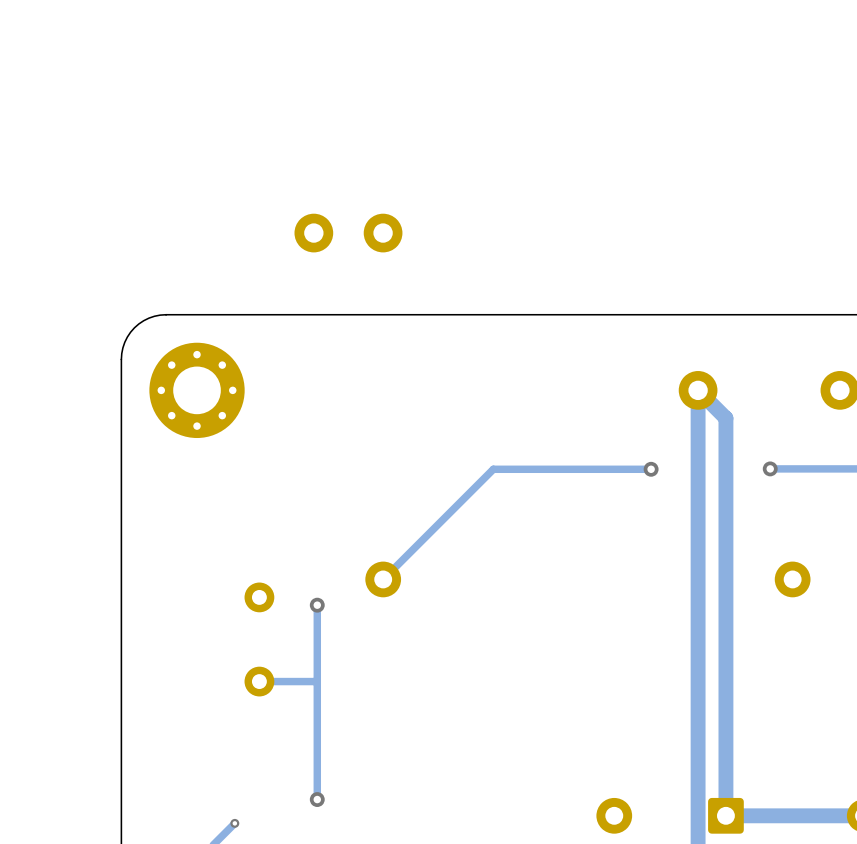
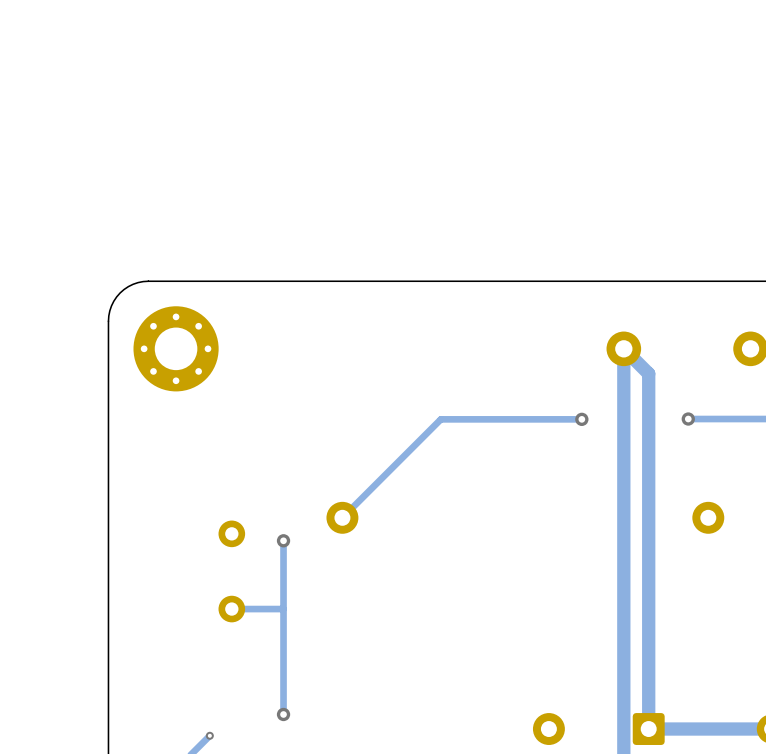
part: (313, 233) -> none
part: (383, 233) -> none

